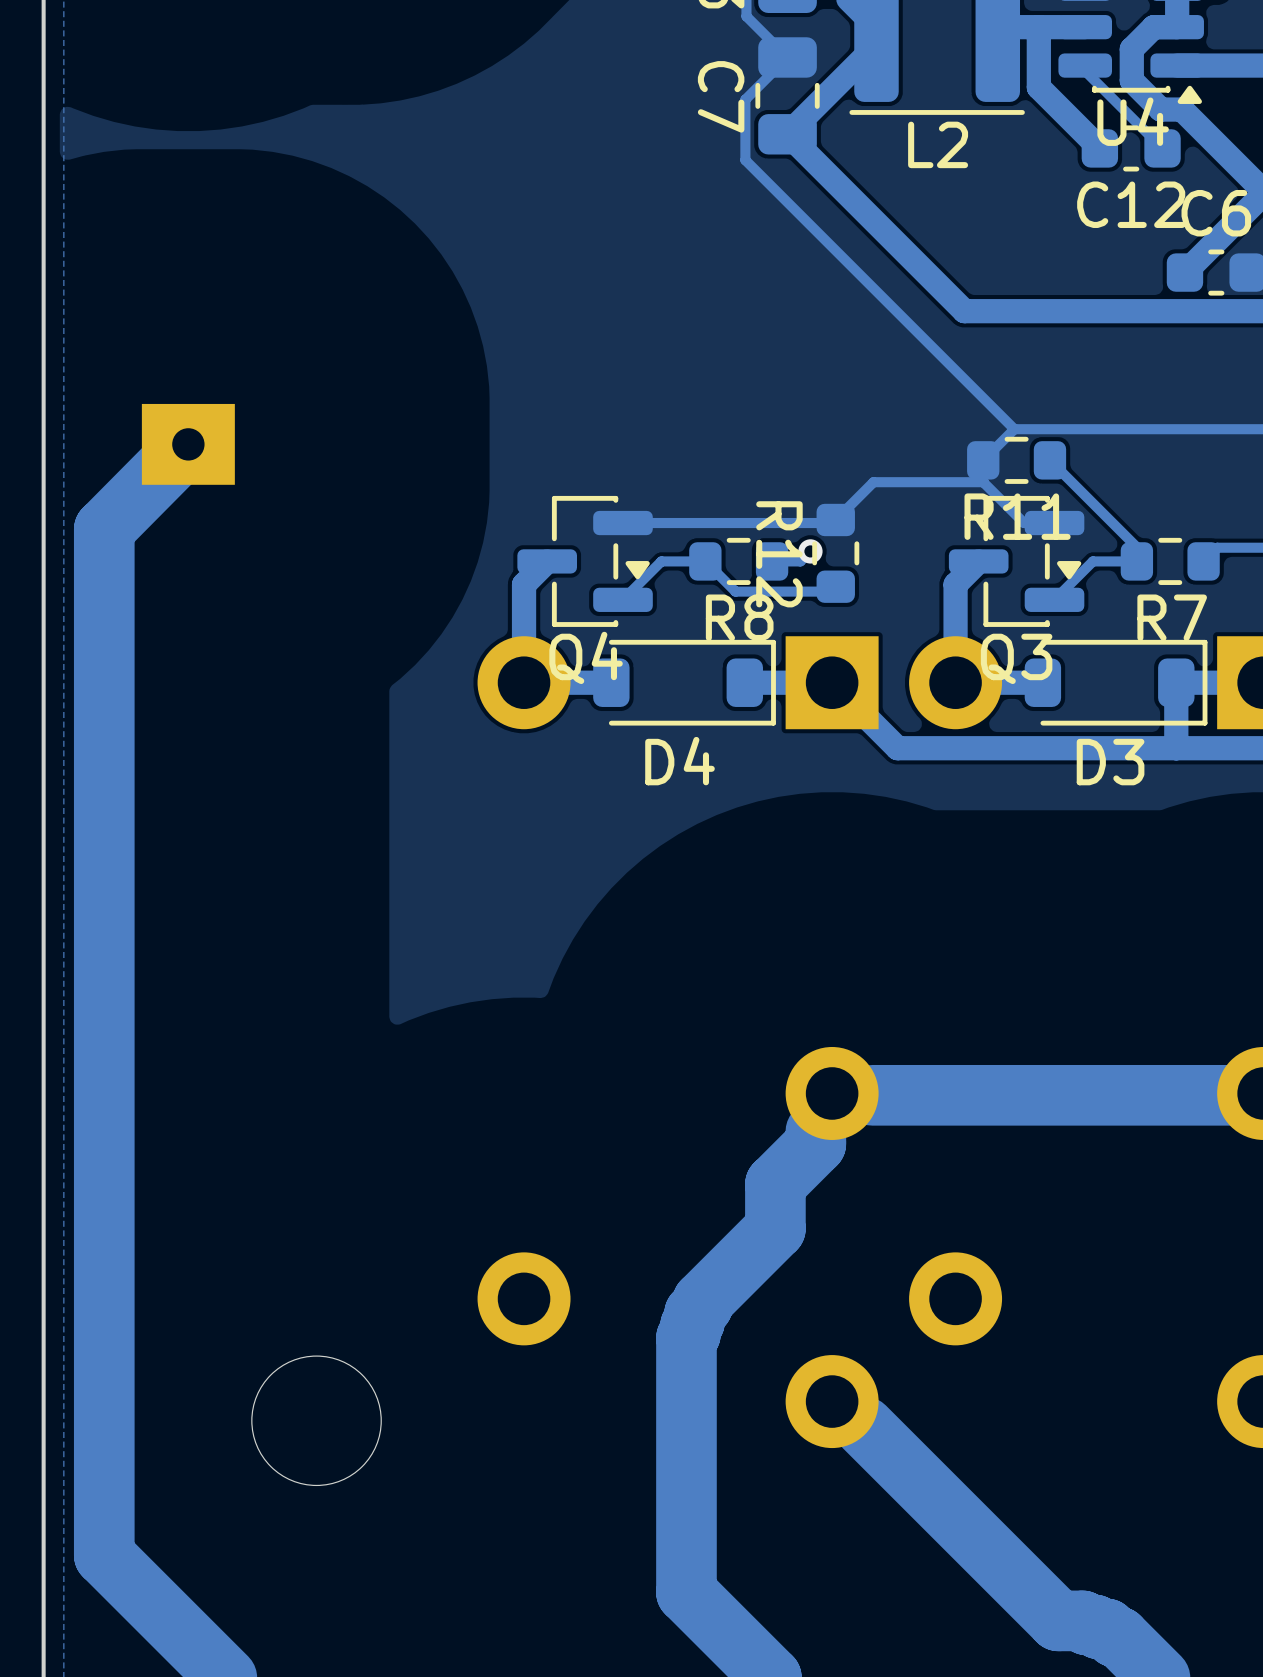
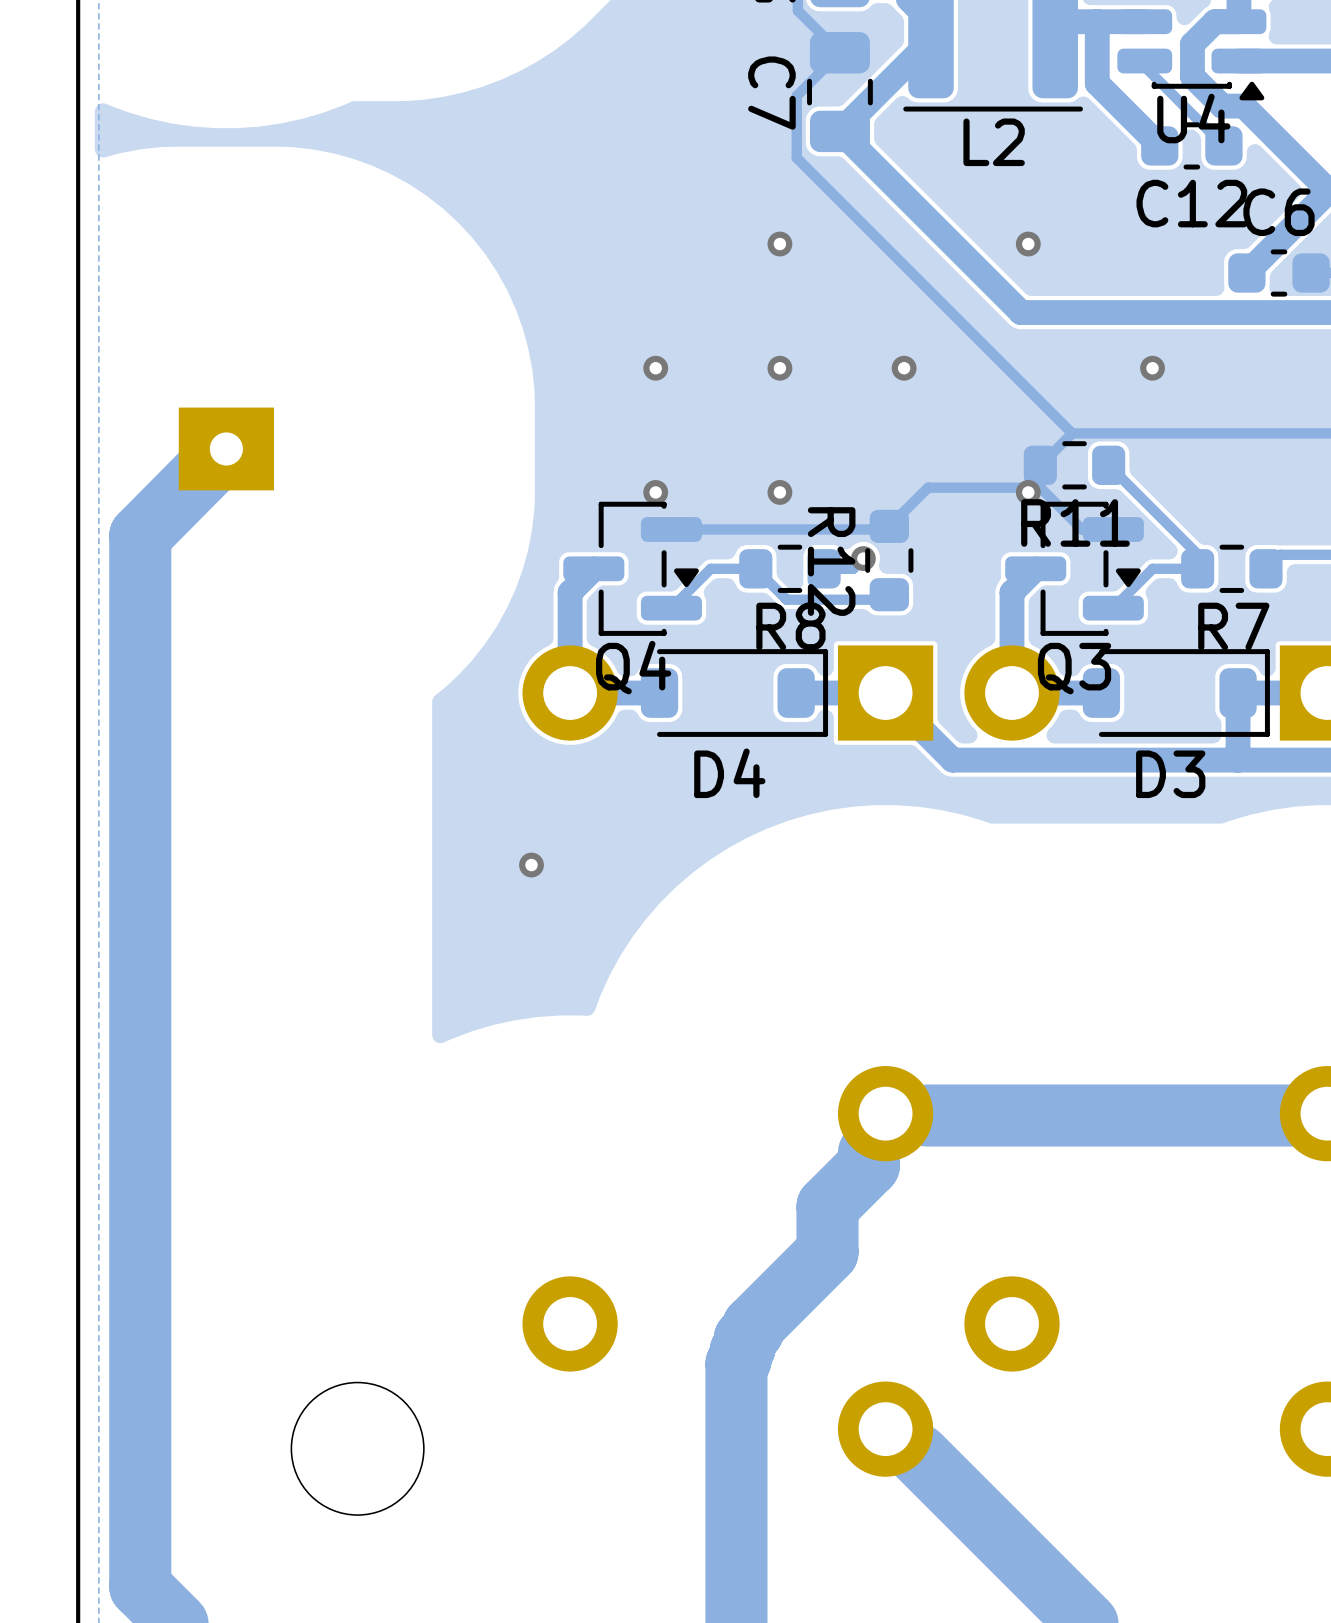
via: none -> (779, 244)
via: none -> (1028, 244)
via: none -> (655, 368)
via: none -> (779, 368)
via: none -> (904, 368)
via: none -> (1152, 368)
via: none -> (655, 492)
via: none -> (779, 492)
via: none -> (1028, 492)
via: none -> (531, 865)

